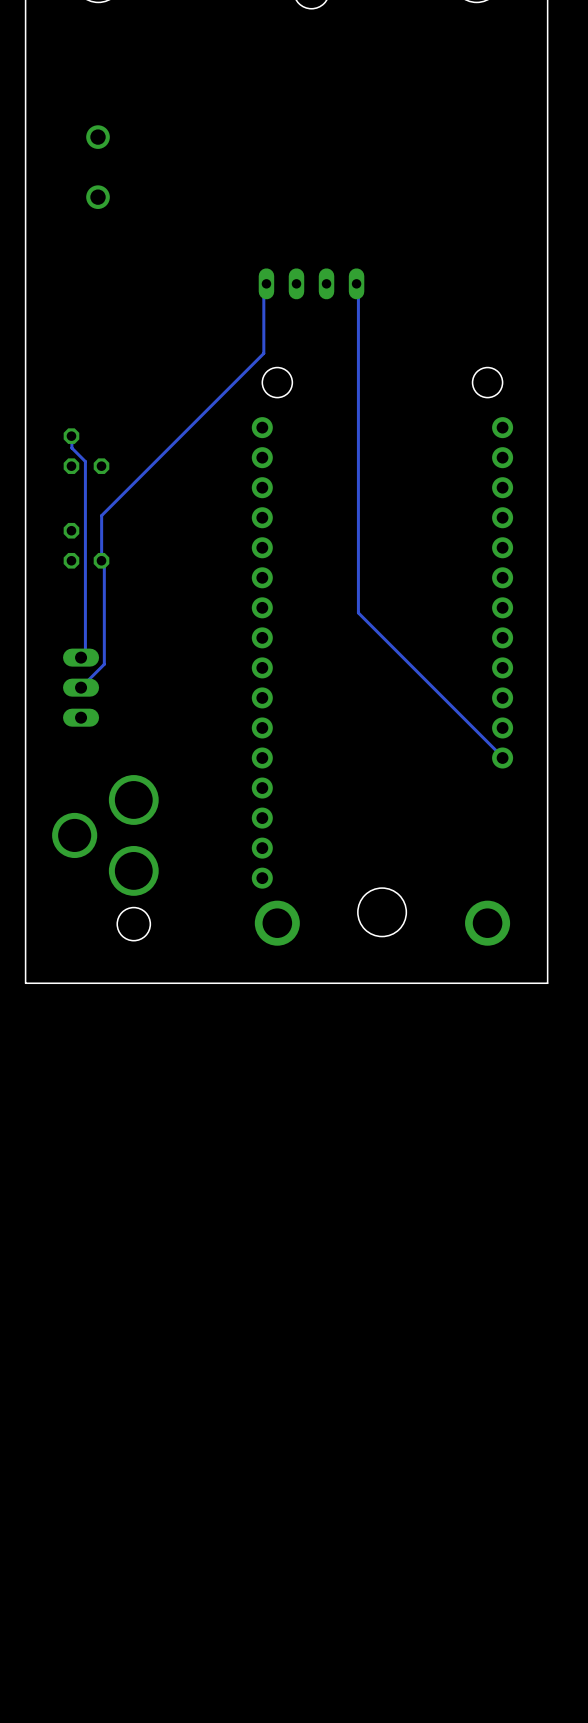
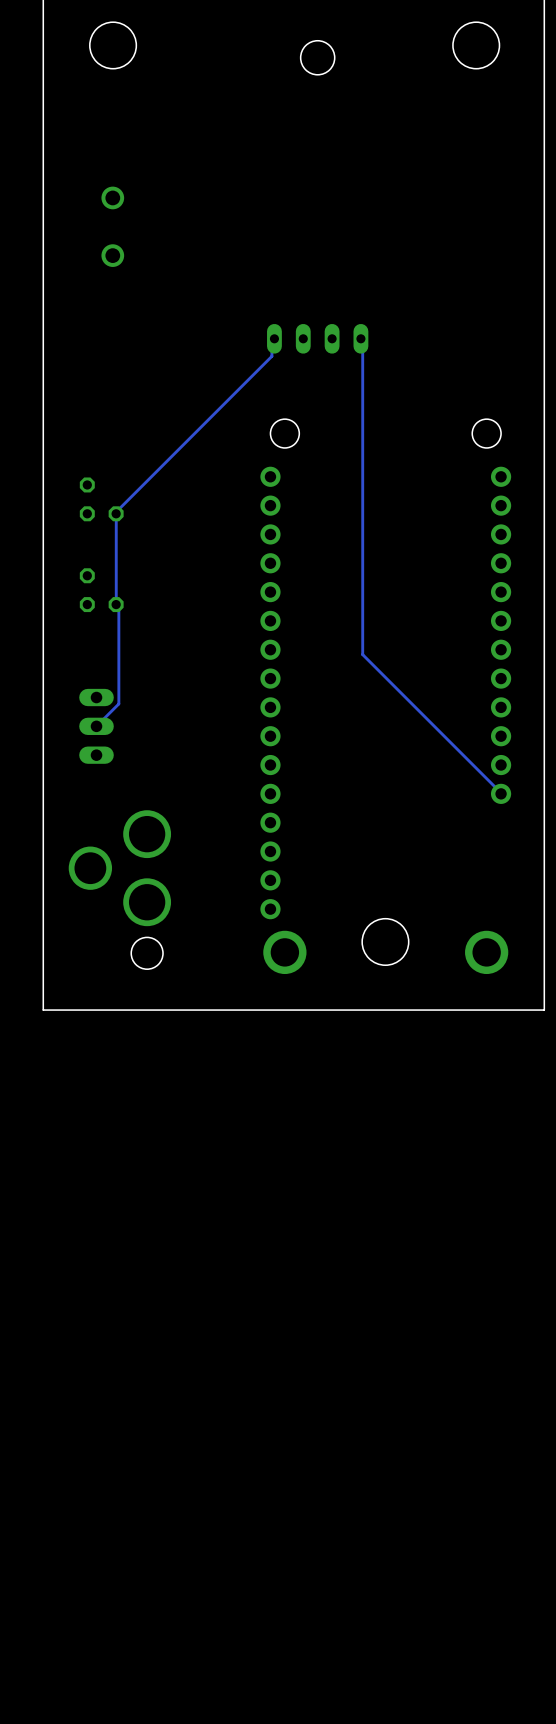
track: (263, 302) (263, 353) (101, 515) -> (271, 356) (116, 511) (116, 561)
track: (71, 436) (71, 448) (85, 461) (85, 653) (81, 657) -> none

